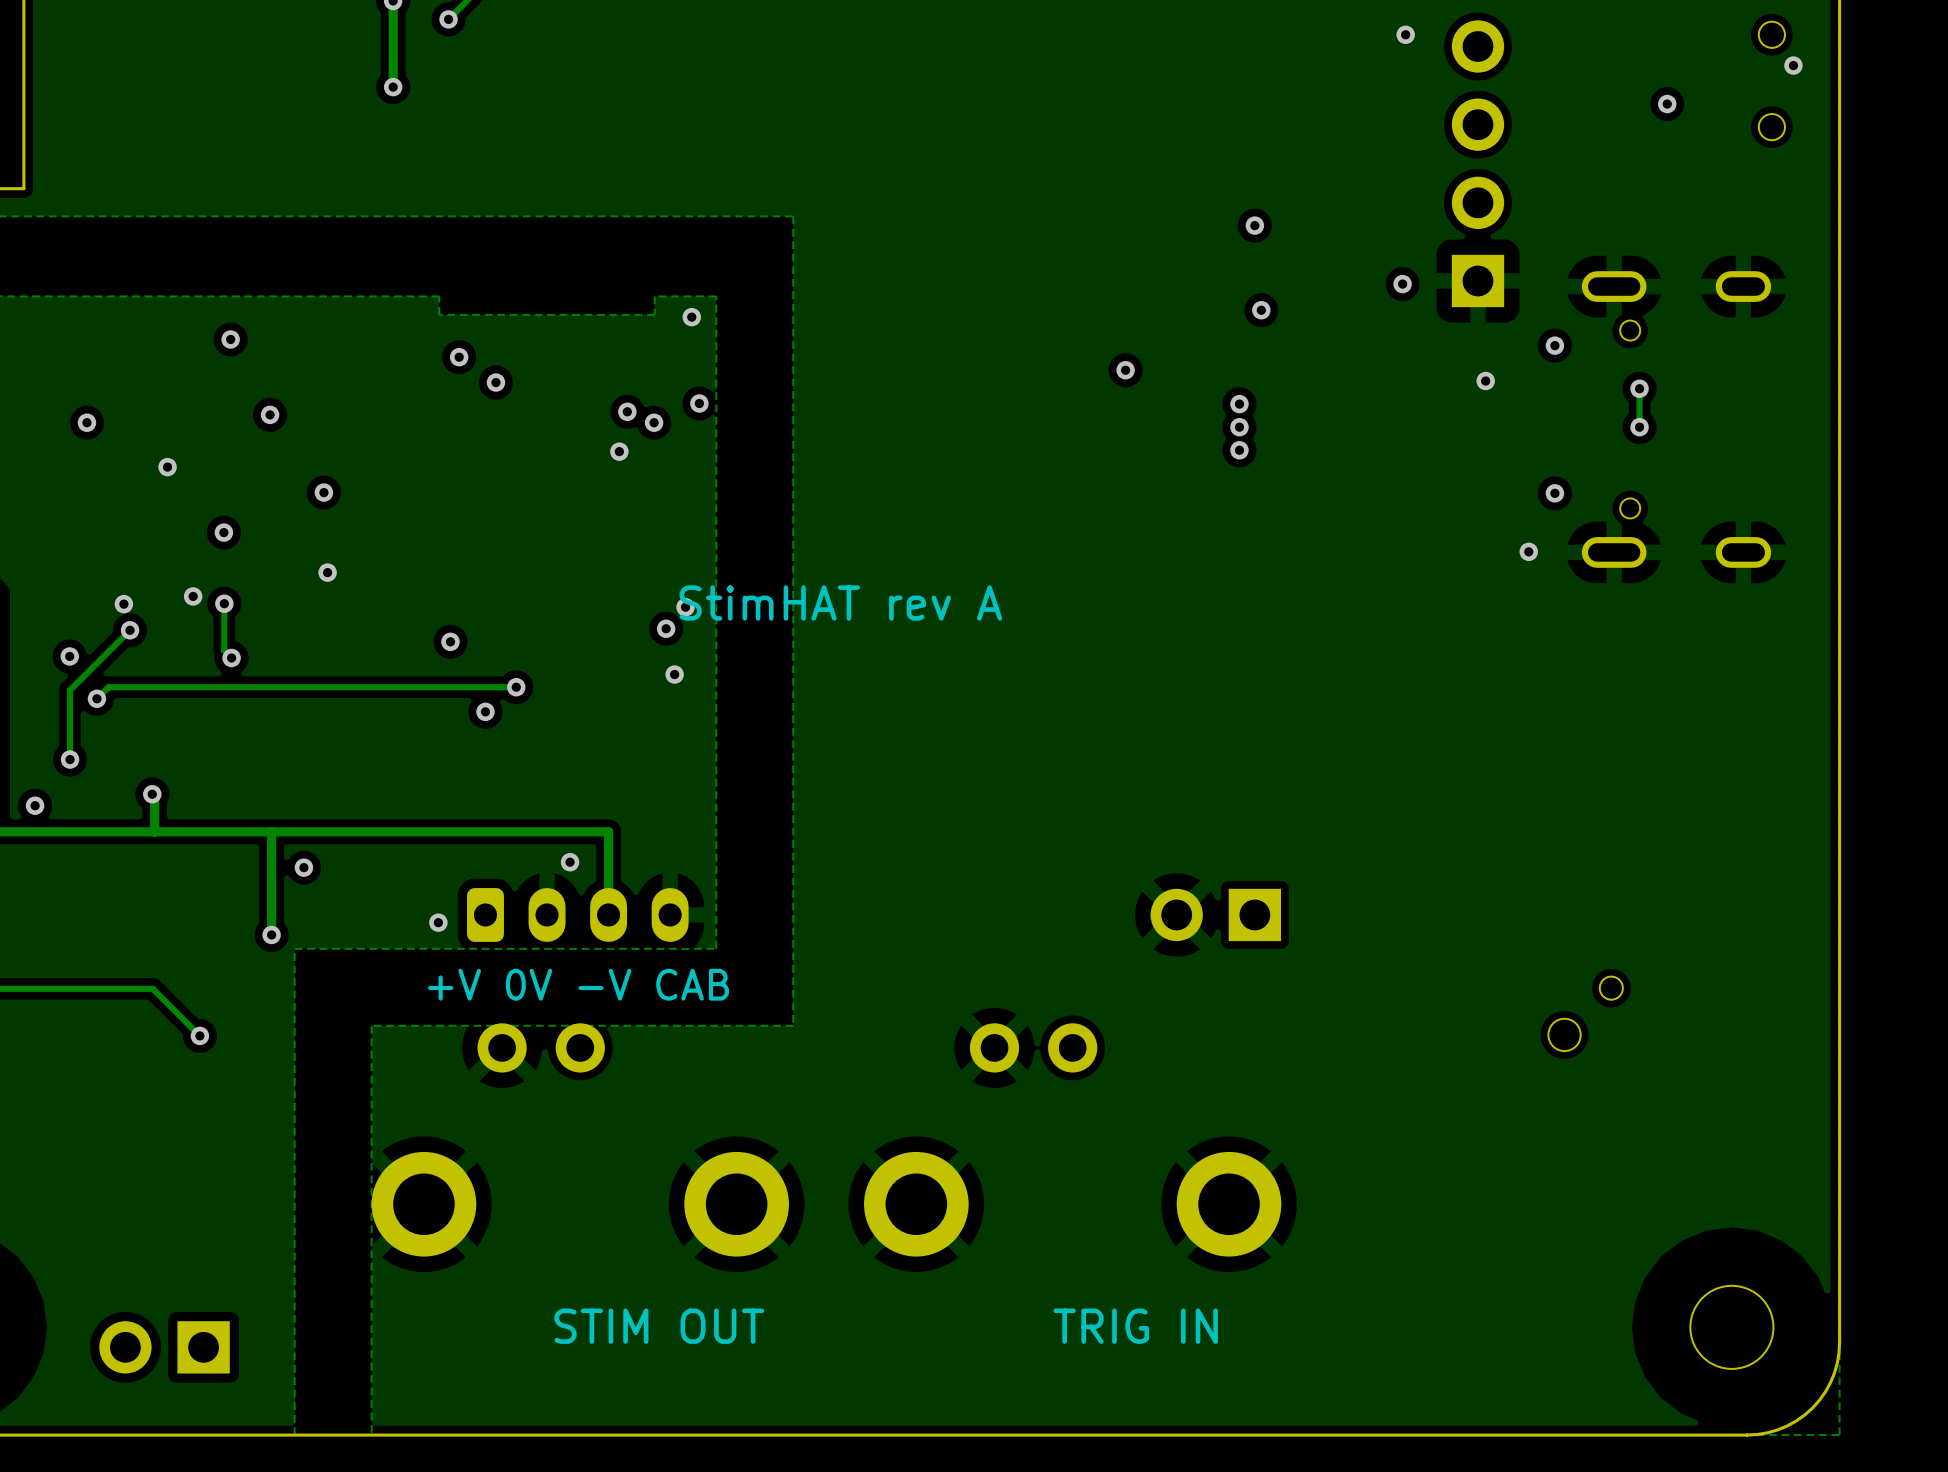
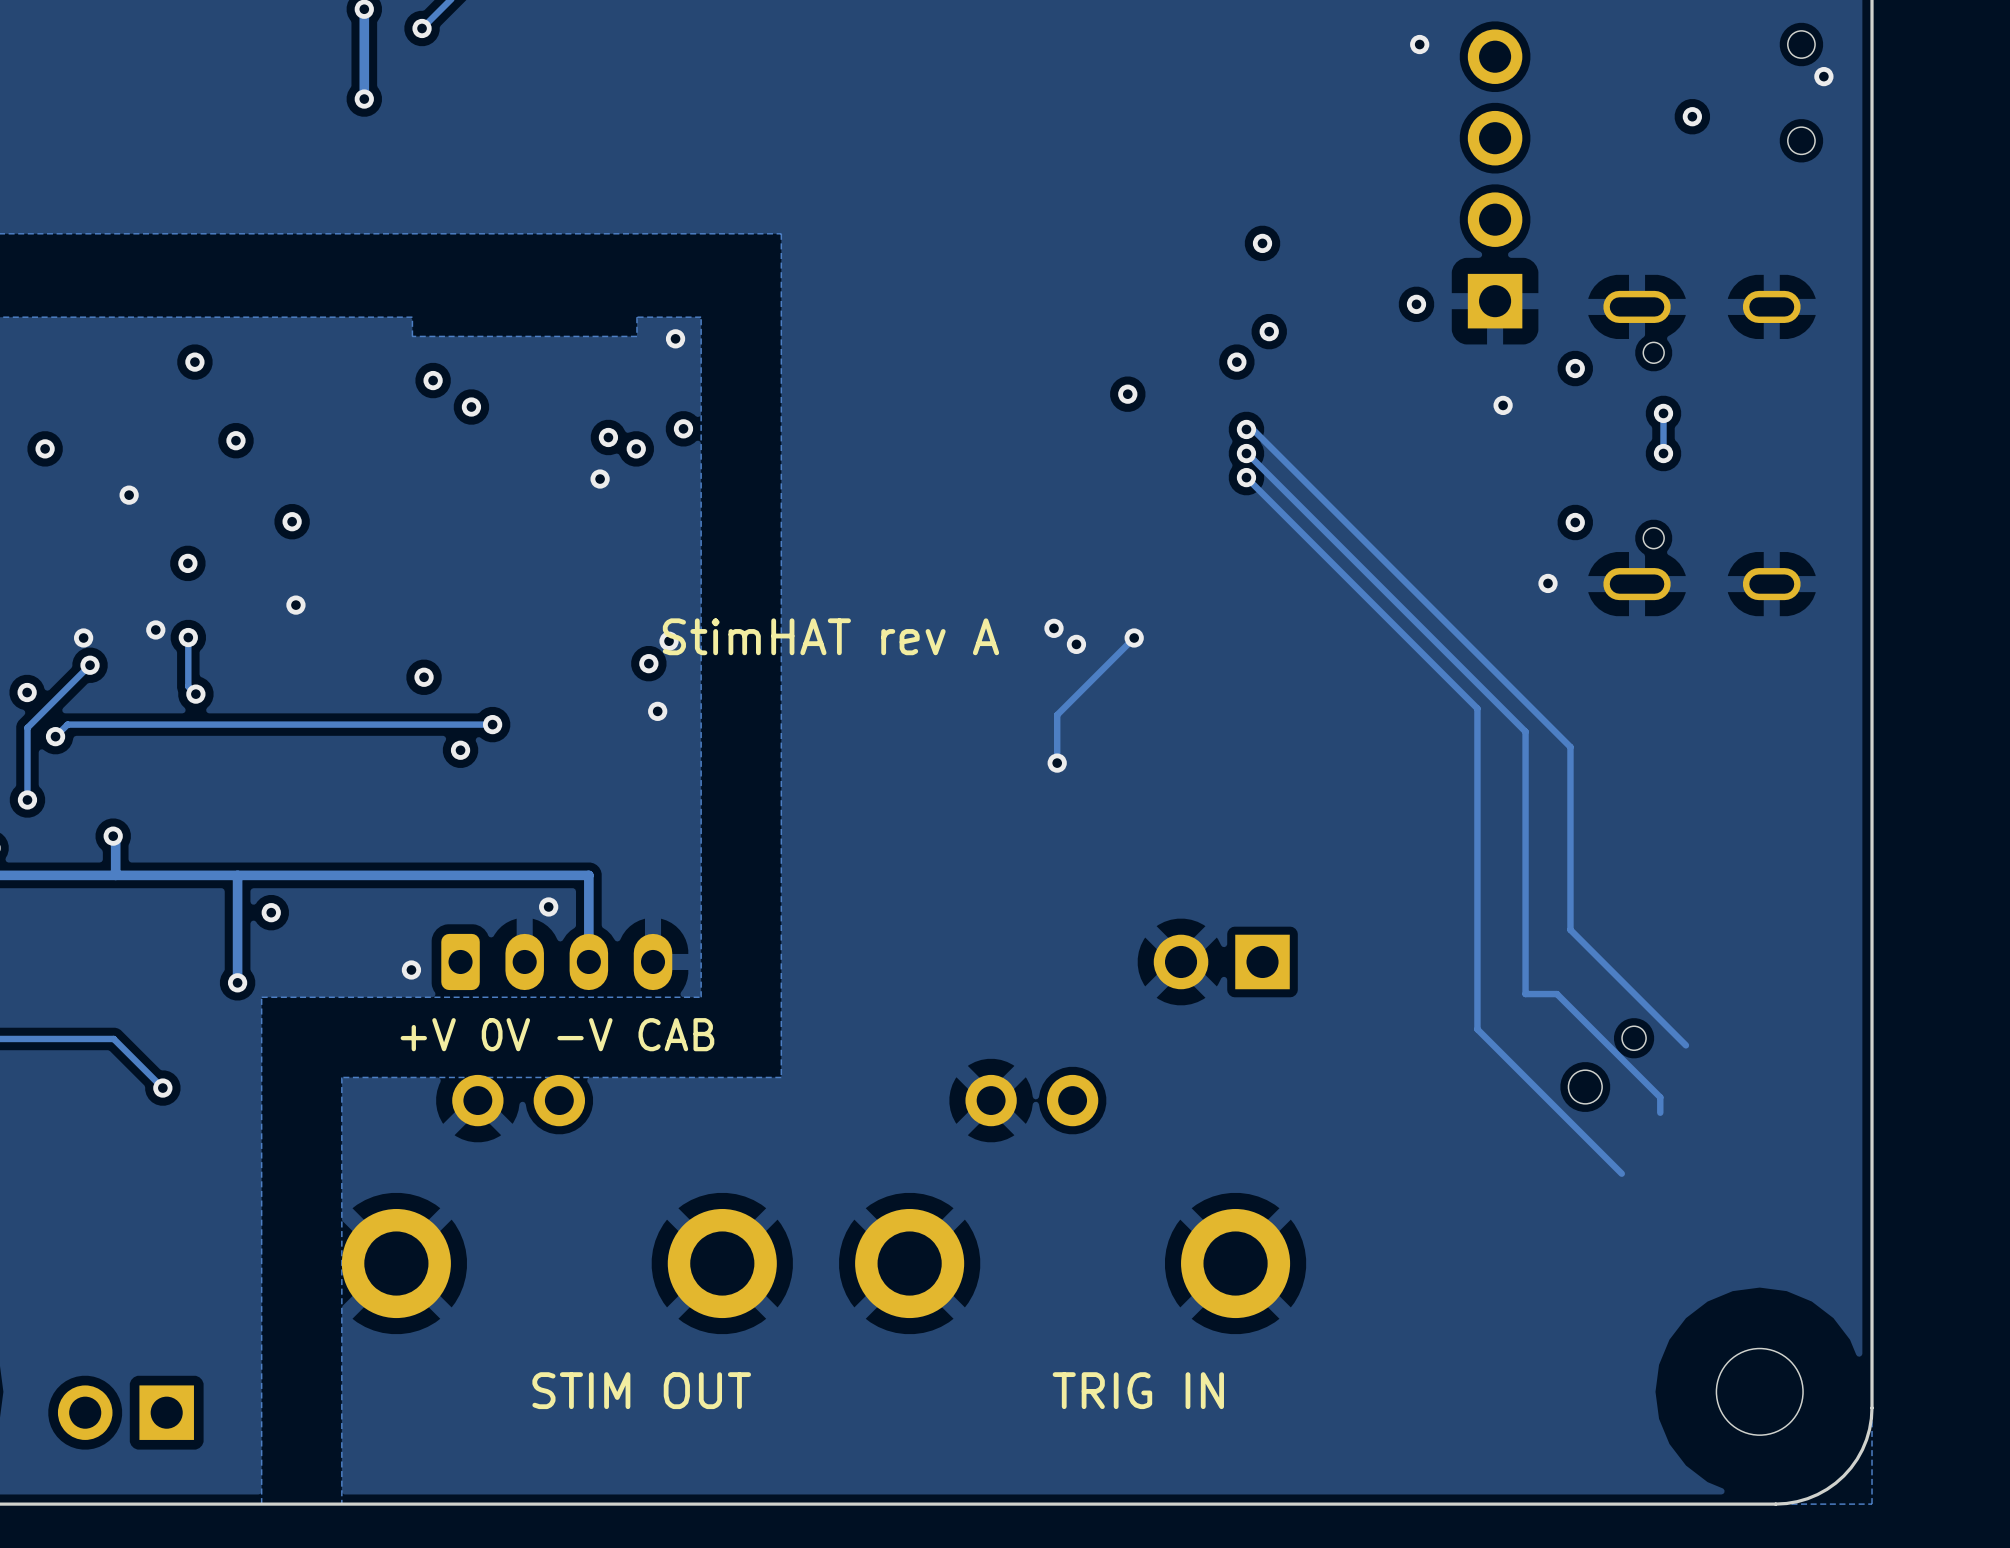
via: none -> (1236, 362)
track: none -> (1246, 429) (1252, 429) (1570, 747) (1570, 929) (1685, 1045)
track: none -> (1246, 453) (1525, 731) (1525, 994) (1556, 994) (1660, 1097) (1660, 1112)
track: none -> (1246, 477) (1477, 708) (1477, 1029) (1621, 1173)
via: none -> (1053, 628)
track: none -> (1134, 637) (1057, 714) (1057, 763)
via: none -> (1134, 637)
via: none -> (1076, 644)
via: none -> (1057, 763)

